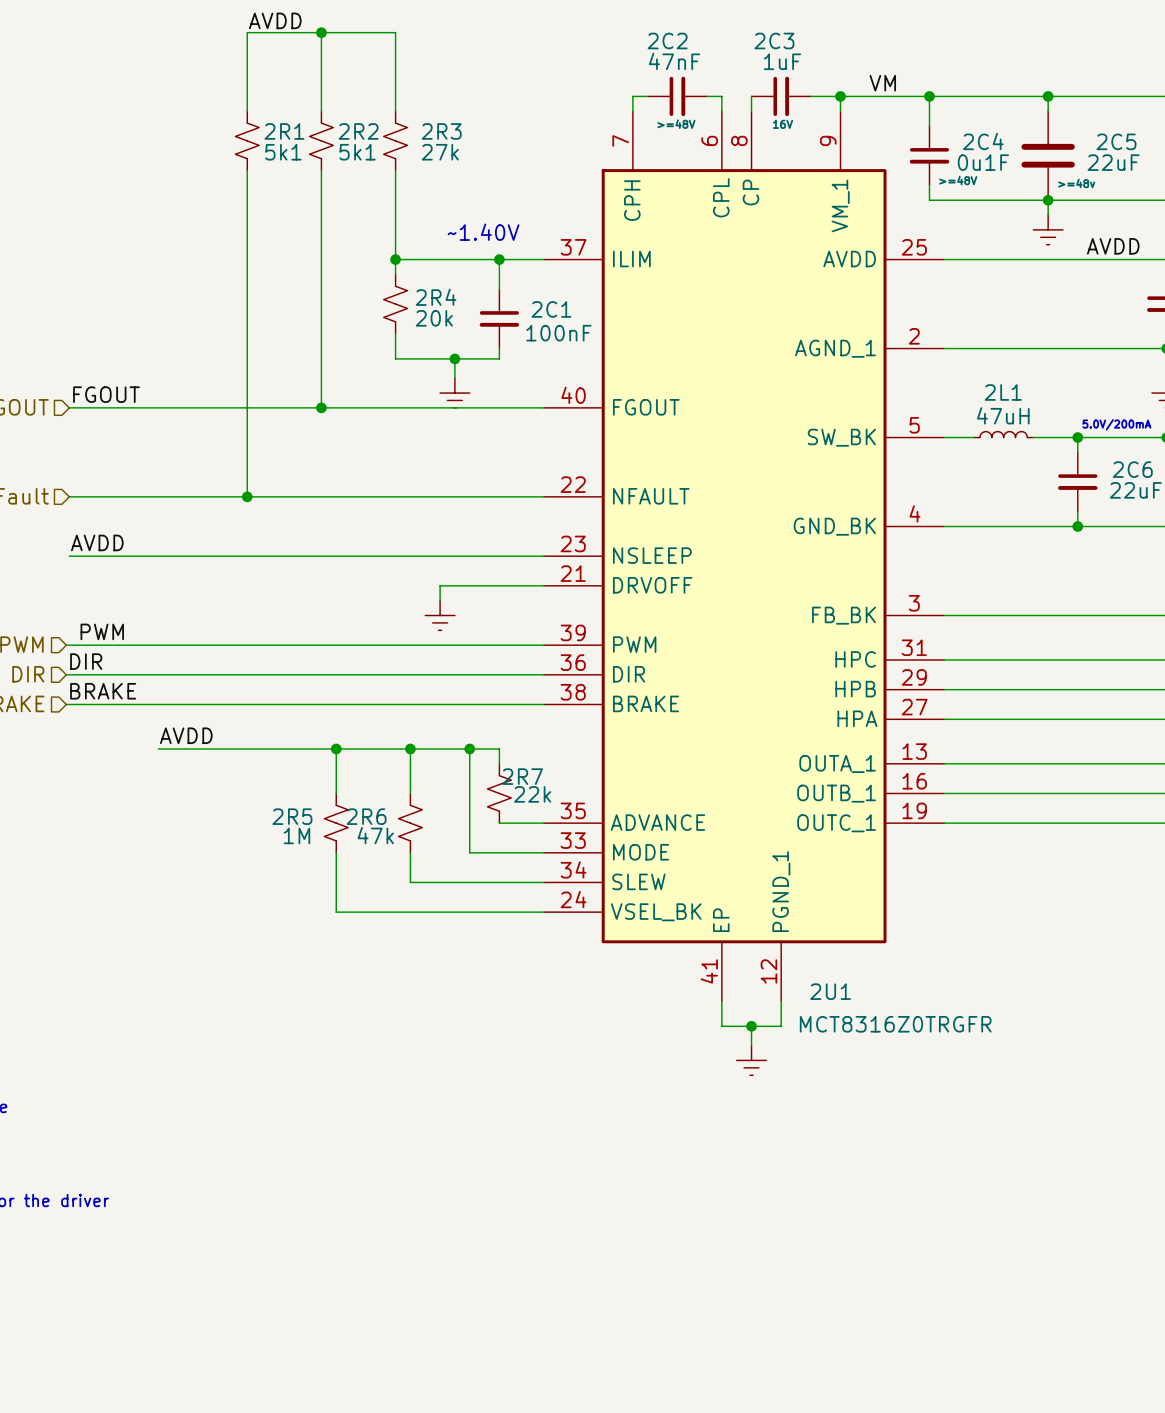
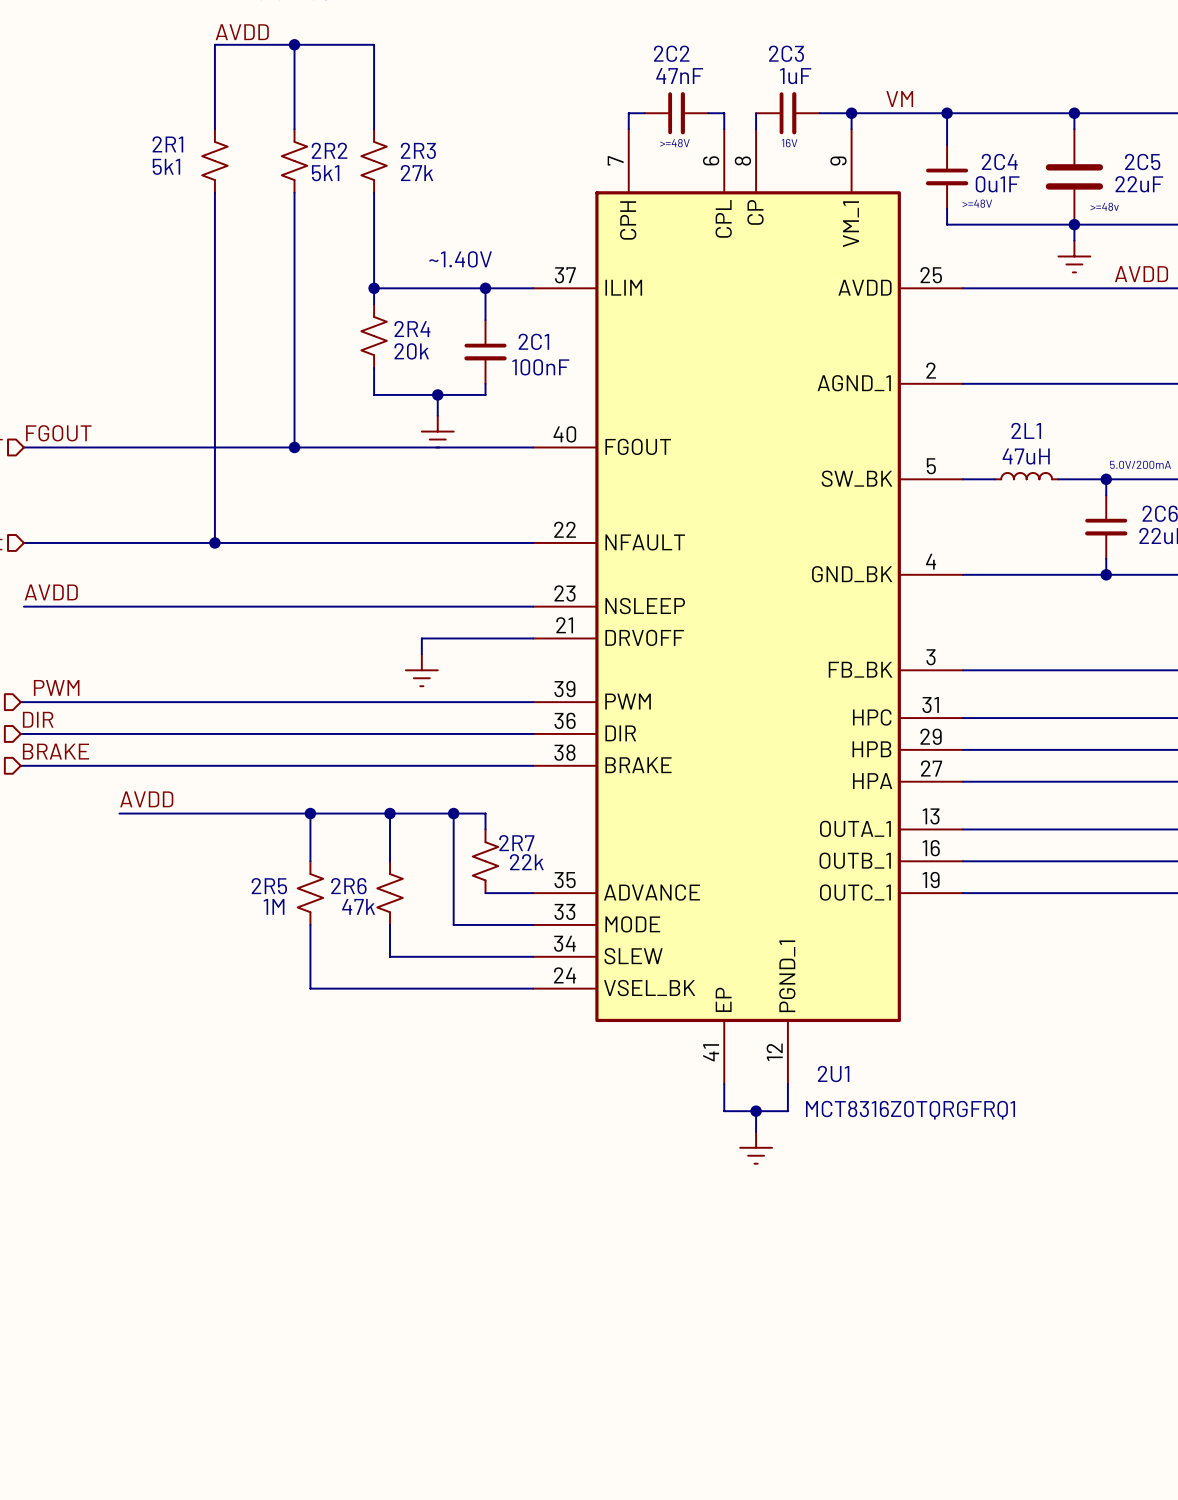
2R1 name position: 2R1 (284, 131) -> 2R1 (167, 144)
2R1 value position: 5k1 (283, 152) -> 5k1 (166, 166)
2U1 value: MCT8316Z0TRGFR (895, 1024) -> MCT8316Z0TQRGFRQ1 (910, 1110)

